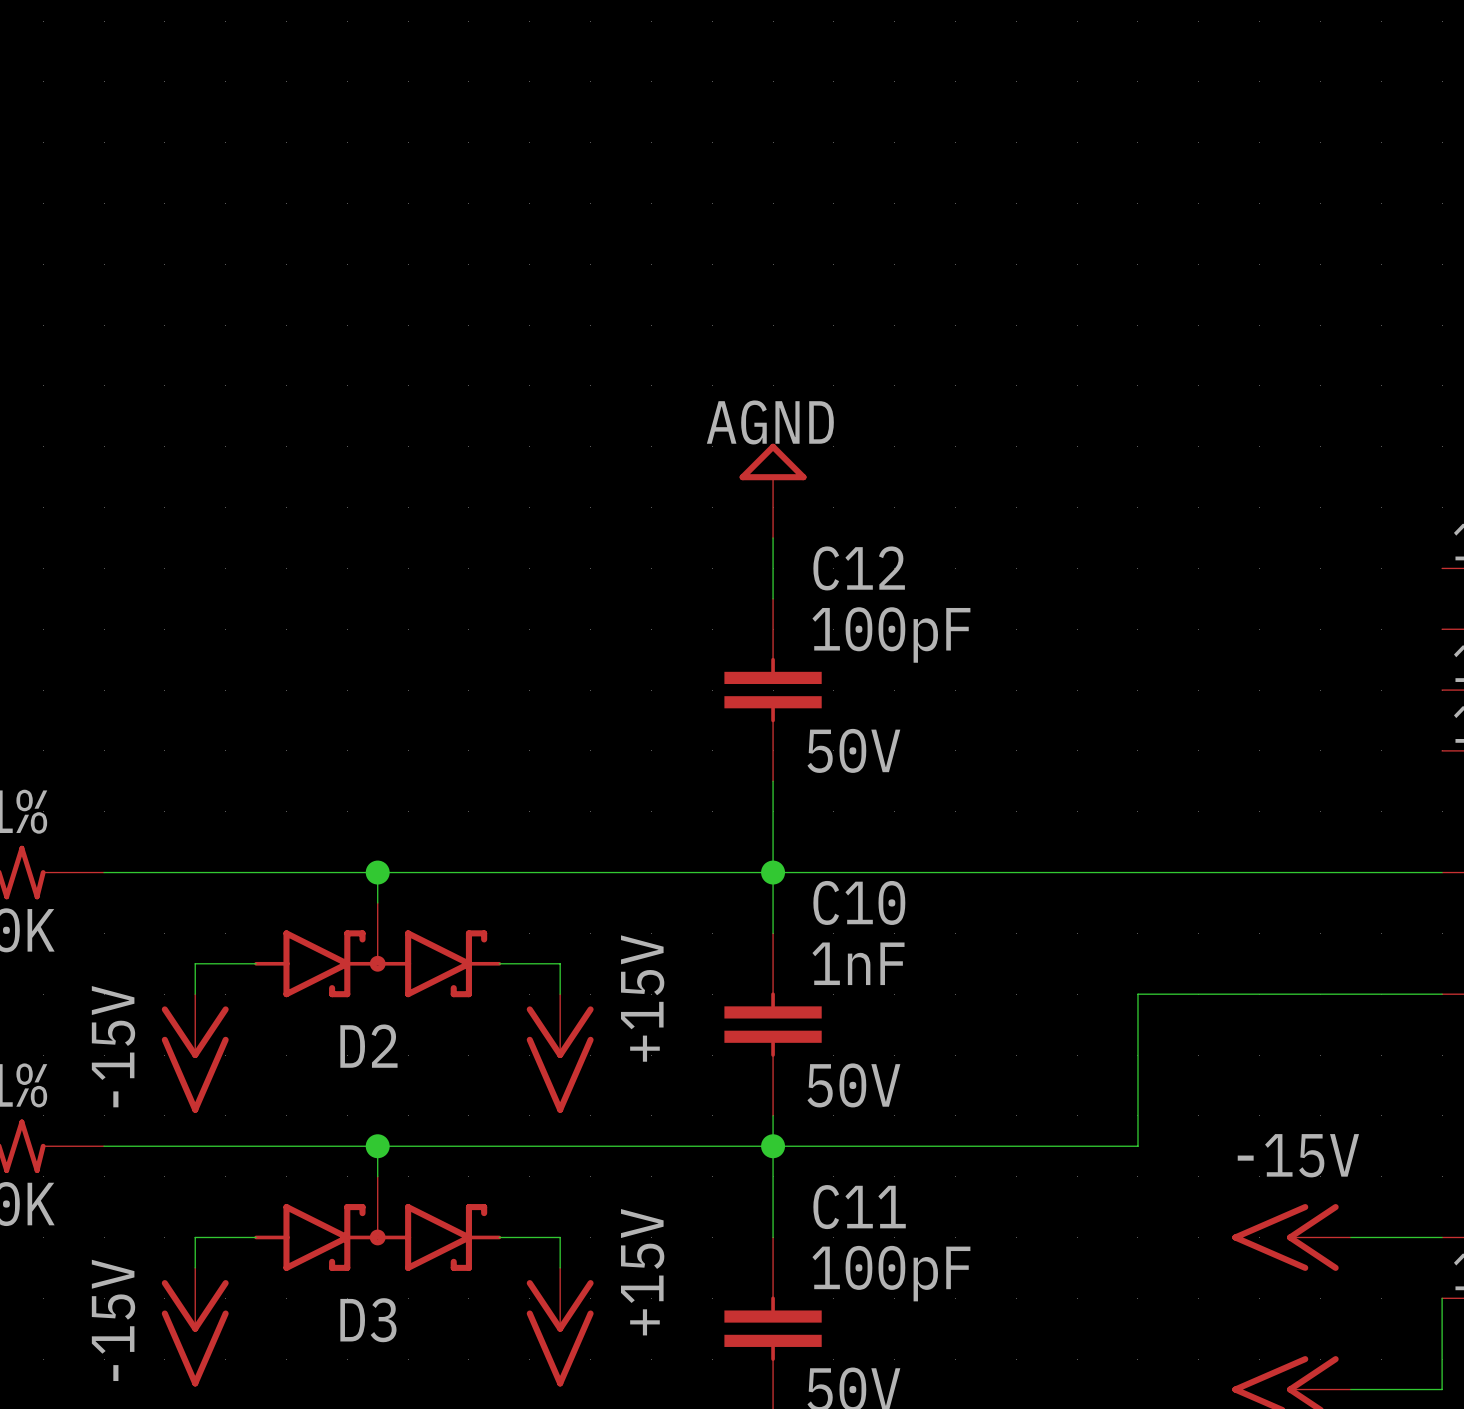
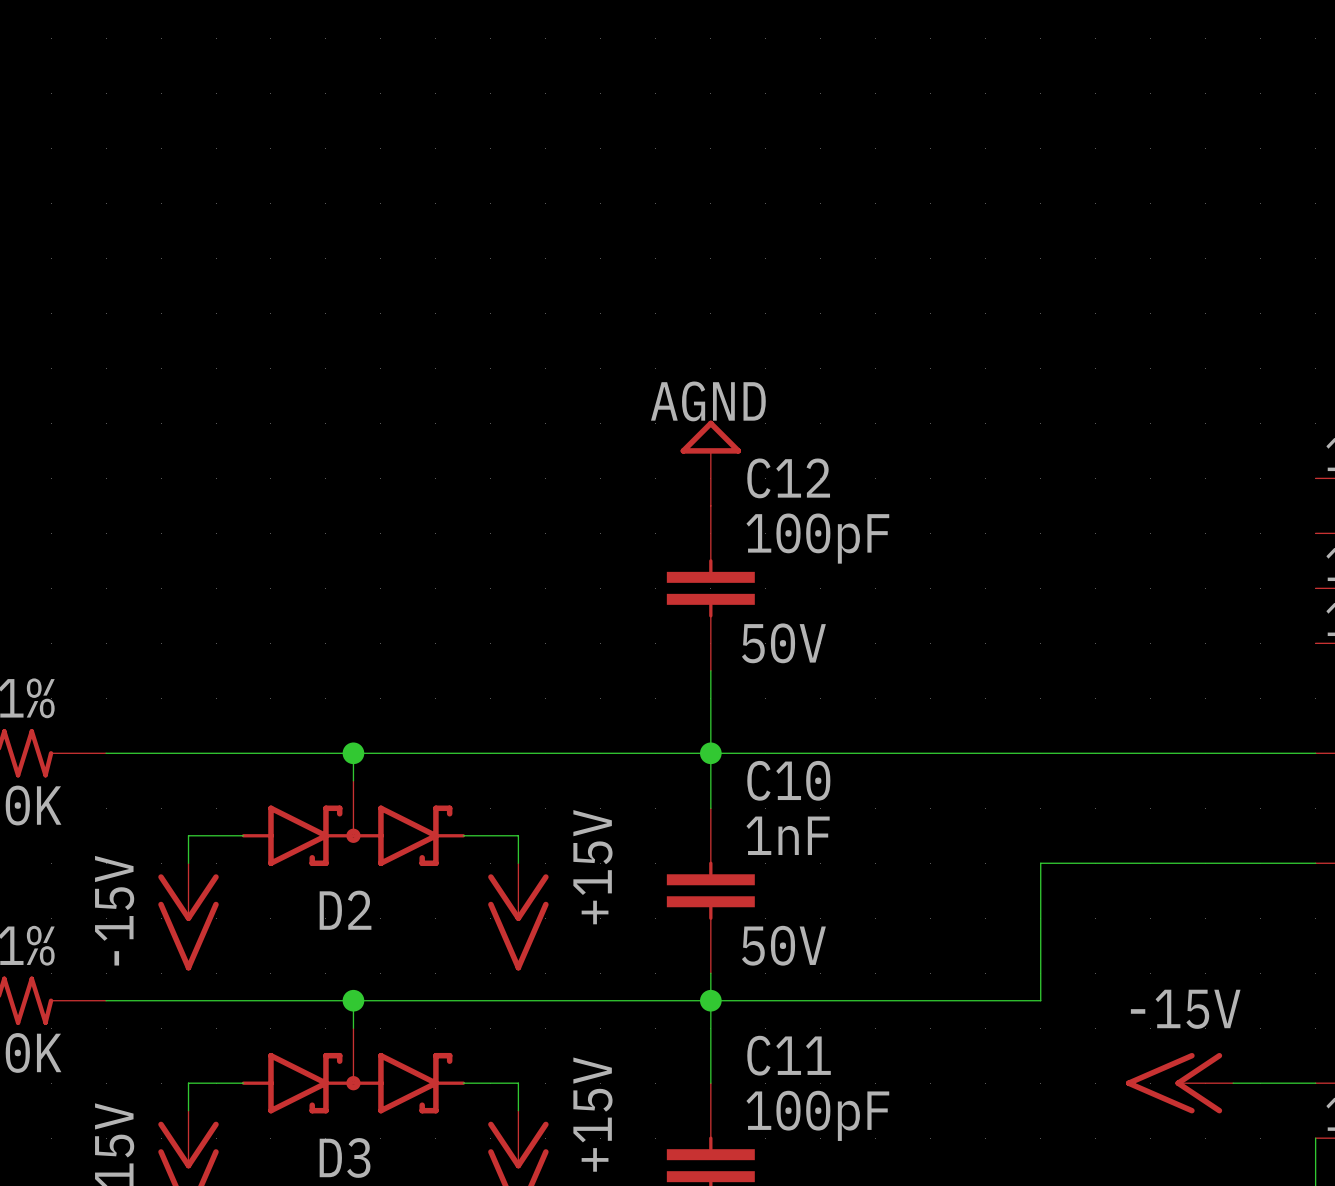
power symbol position: AGND (773, 490) -> AGND (710, 463)

